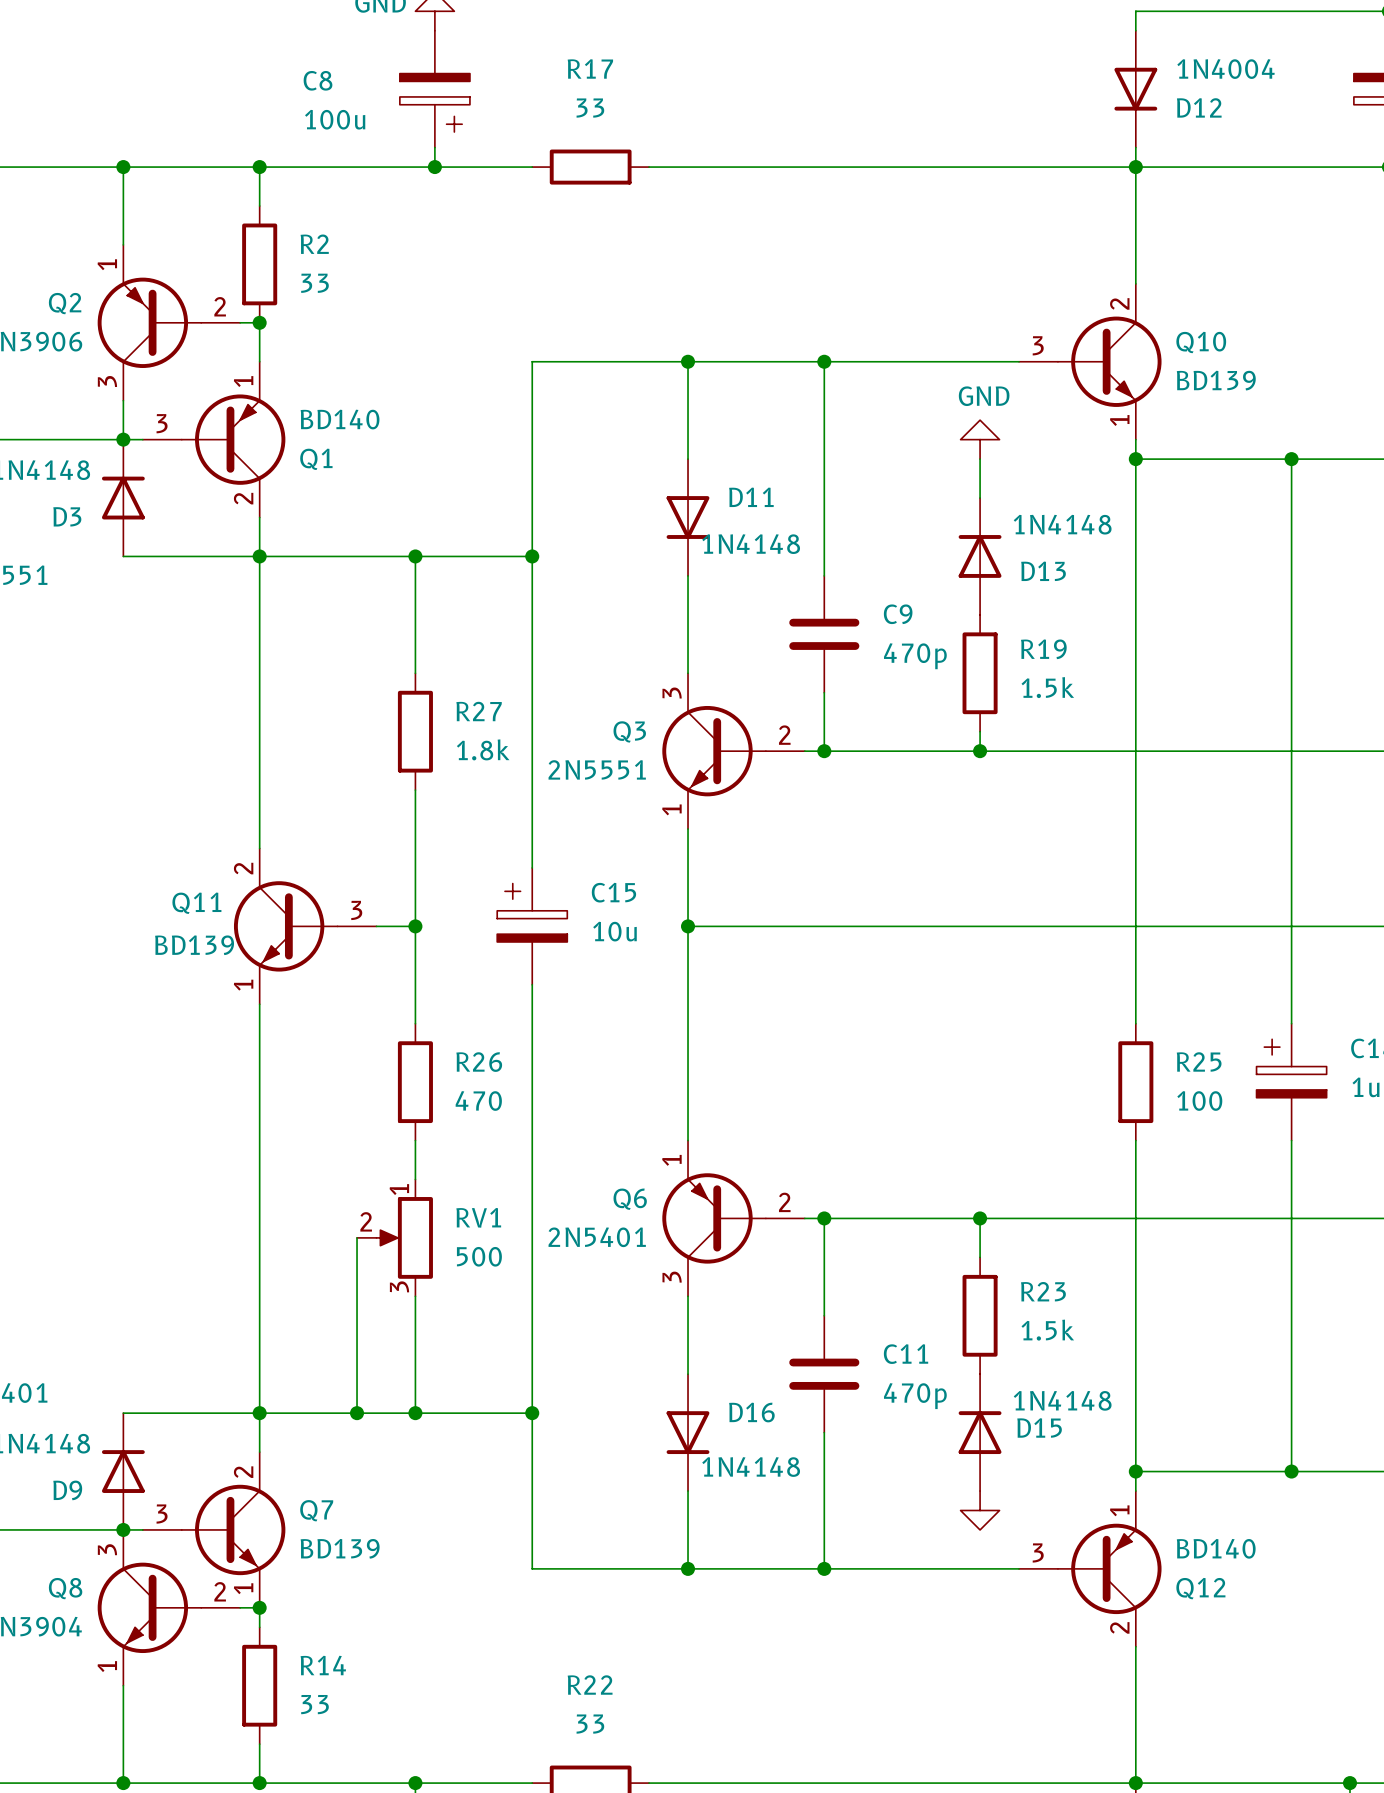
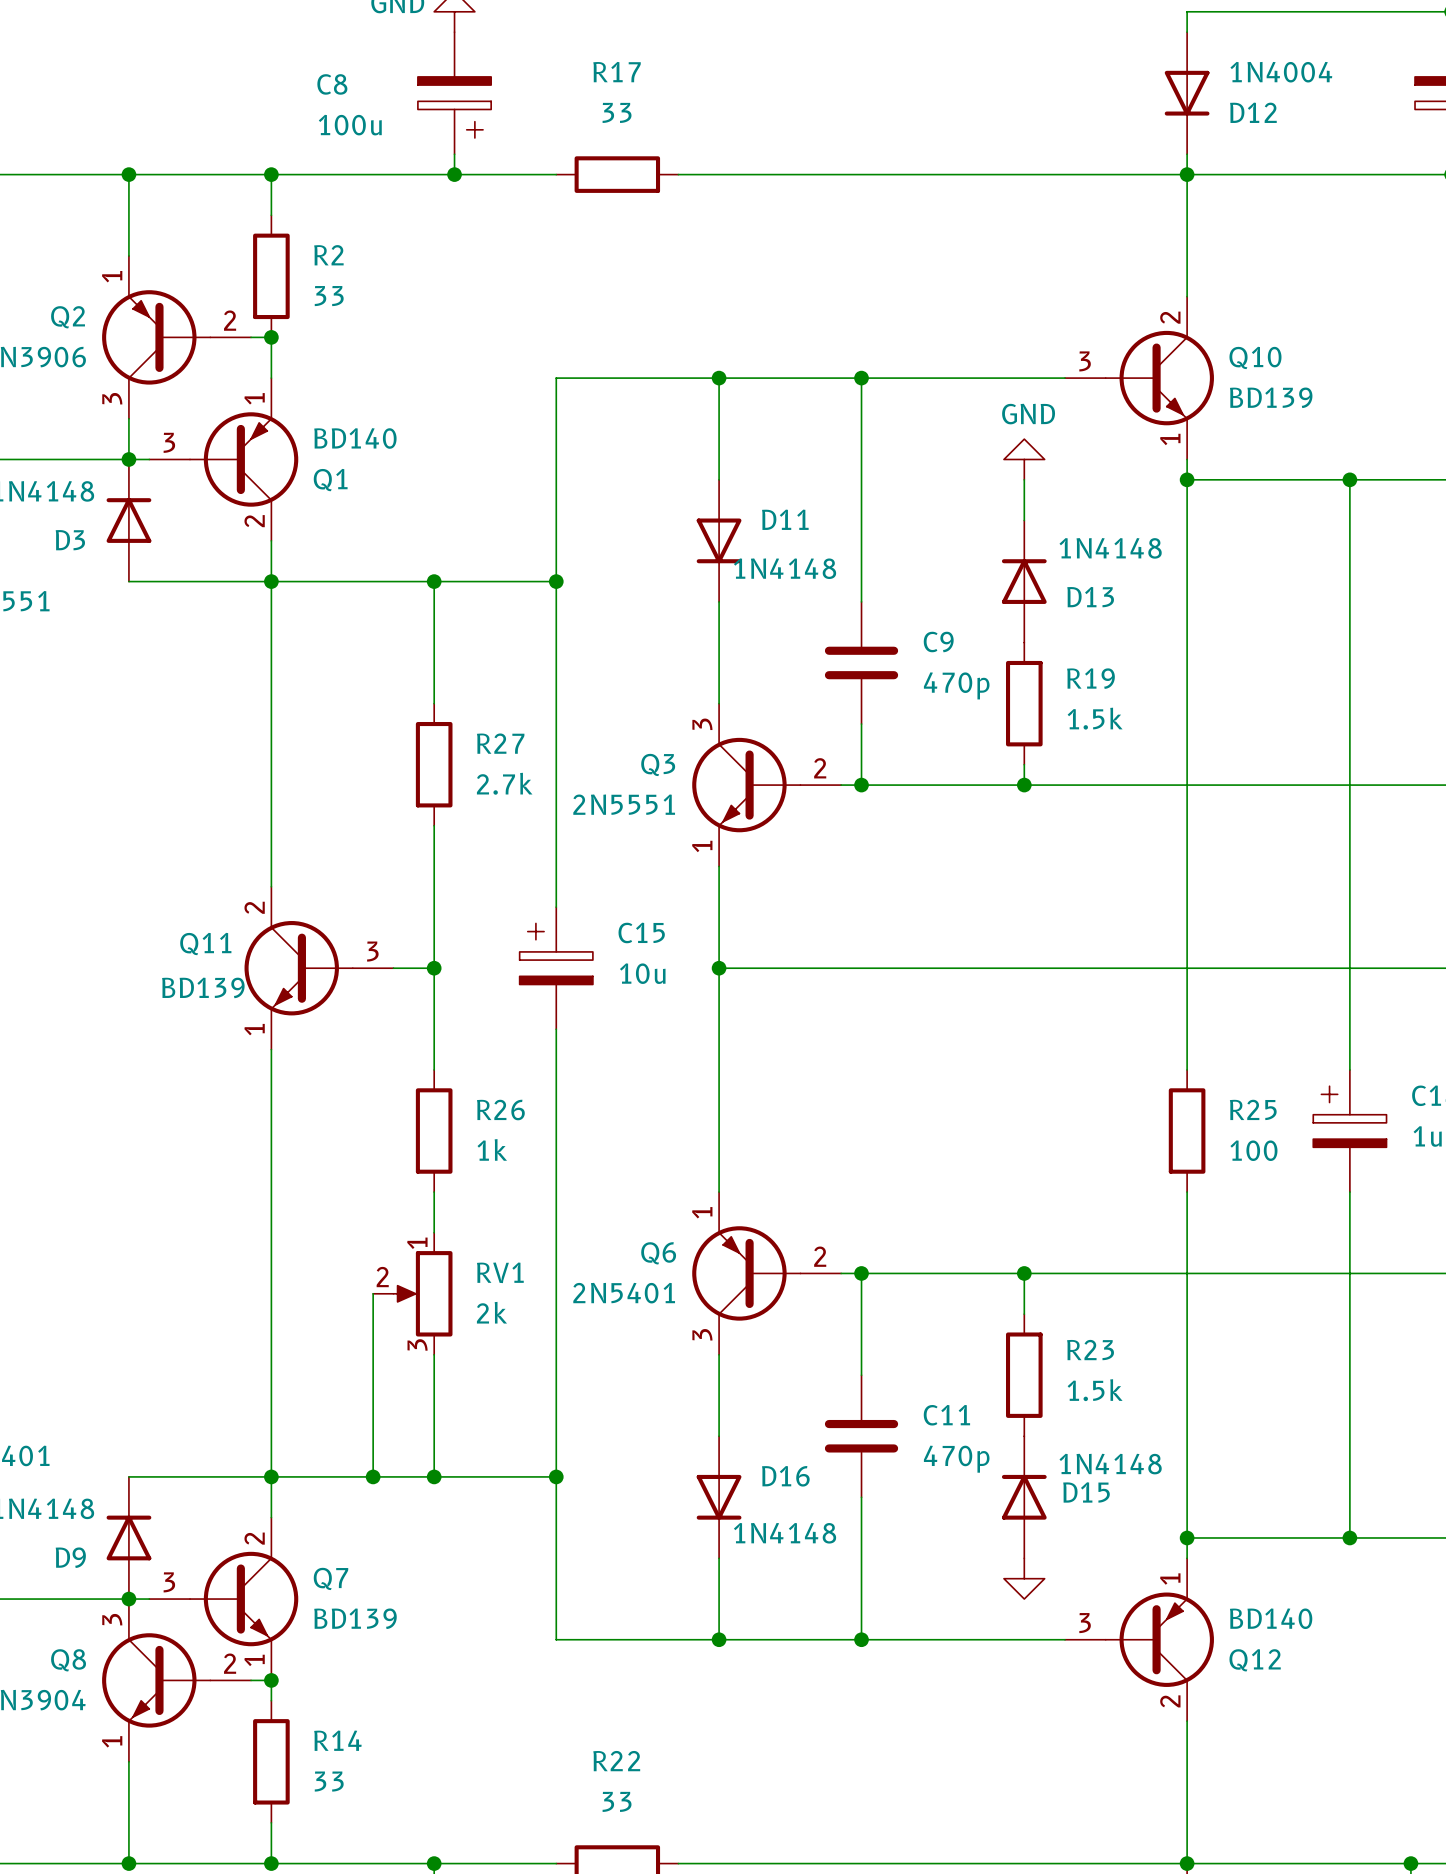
R27 value: 1.8k (483, 749) -> 2.7k (504, 783)
R26 value: 470 (478, 1101) -> 1k (492, 1149)
RV1 value: 500 (479, 1256) -> 2k (491, 1312)

